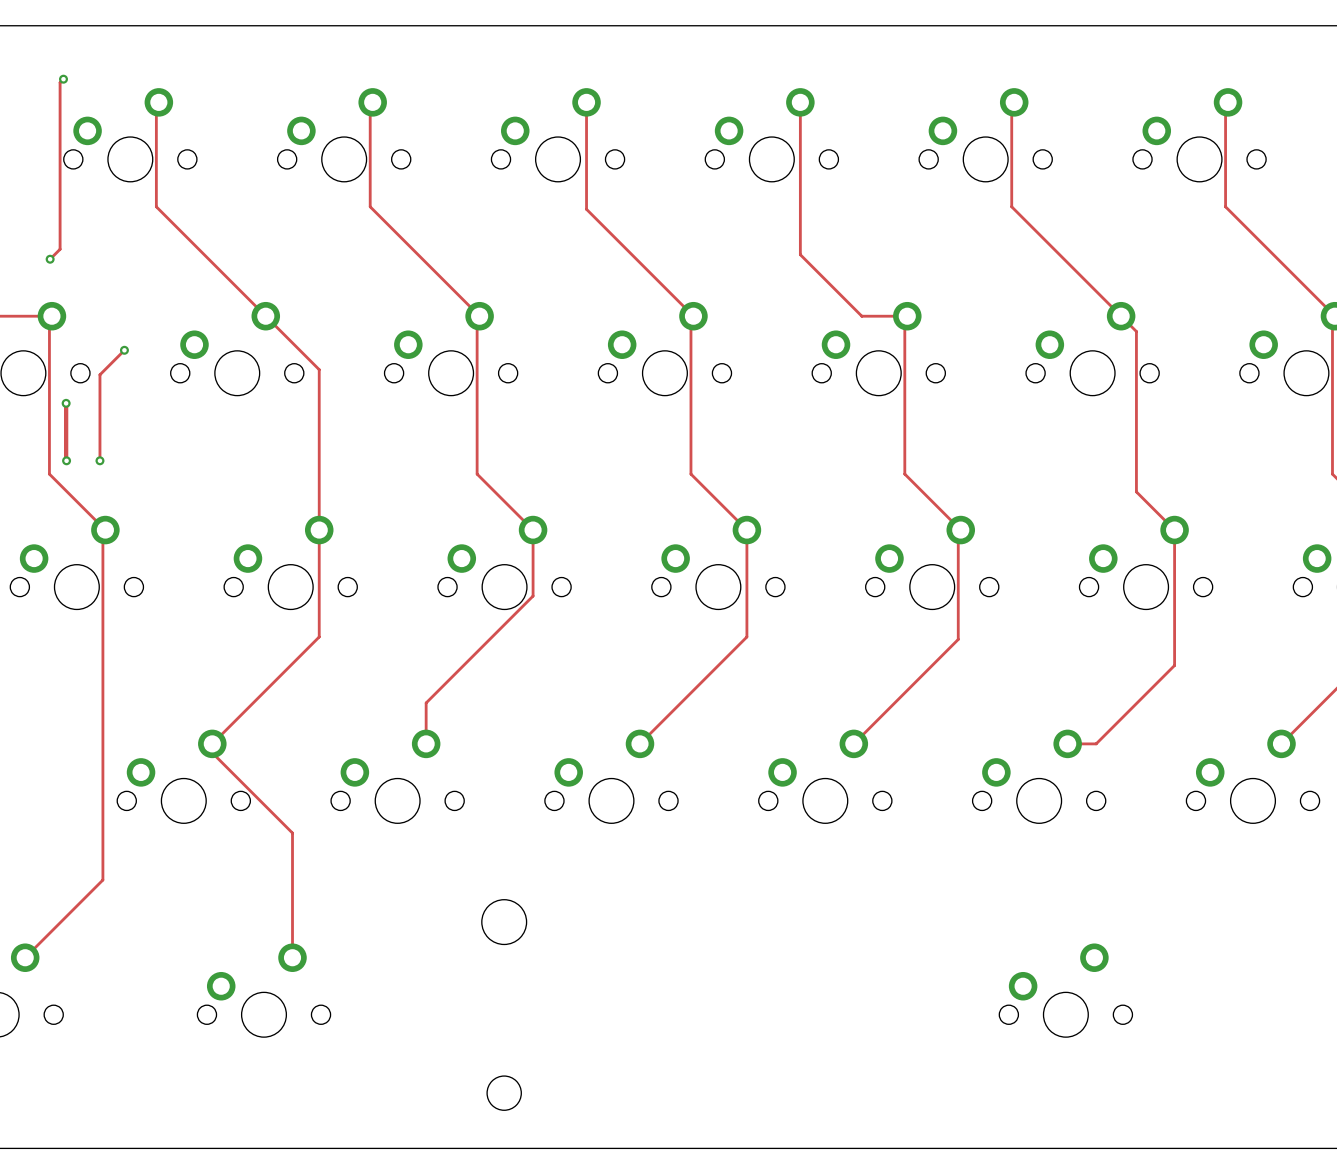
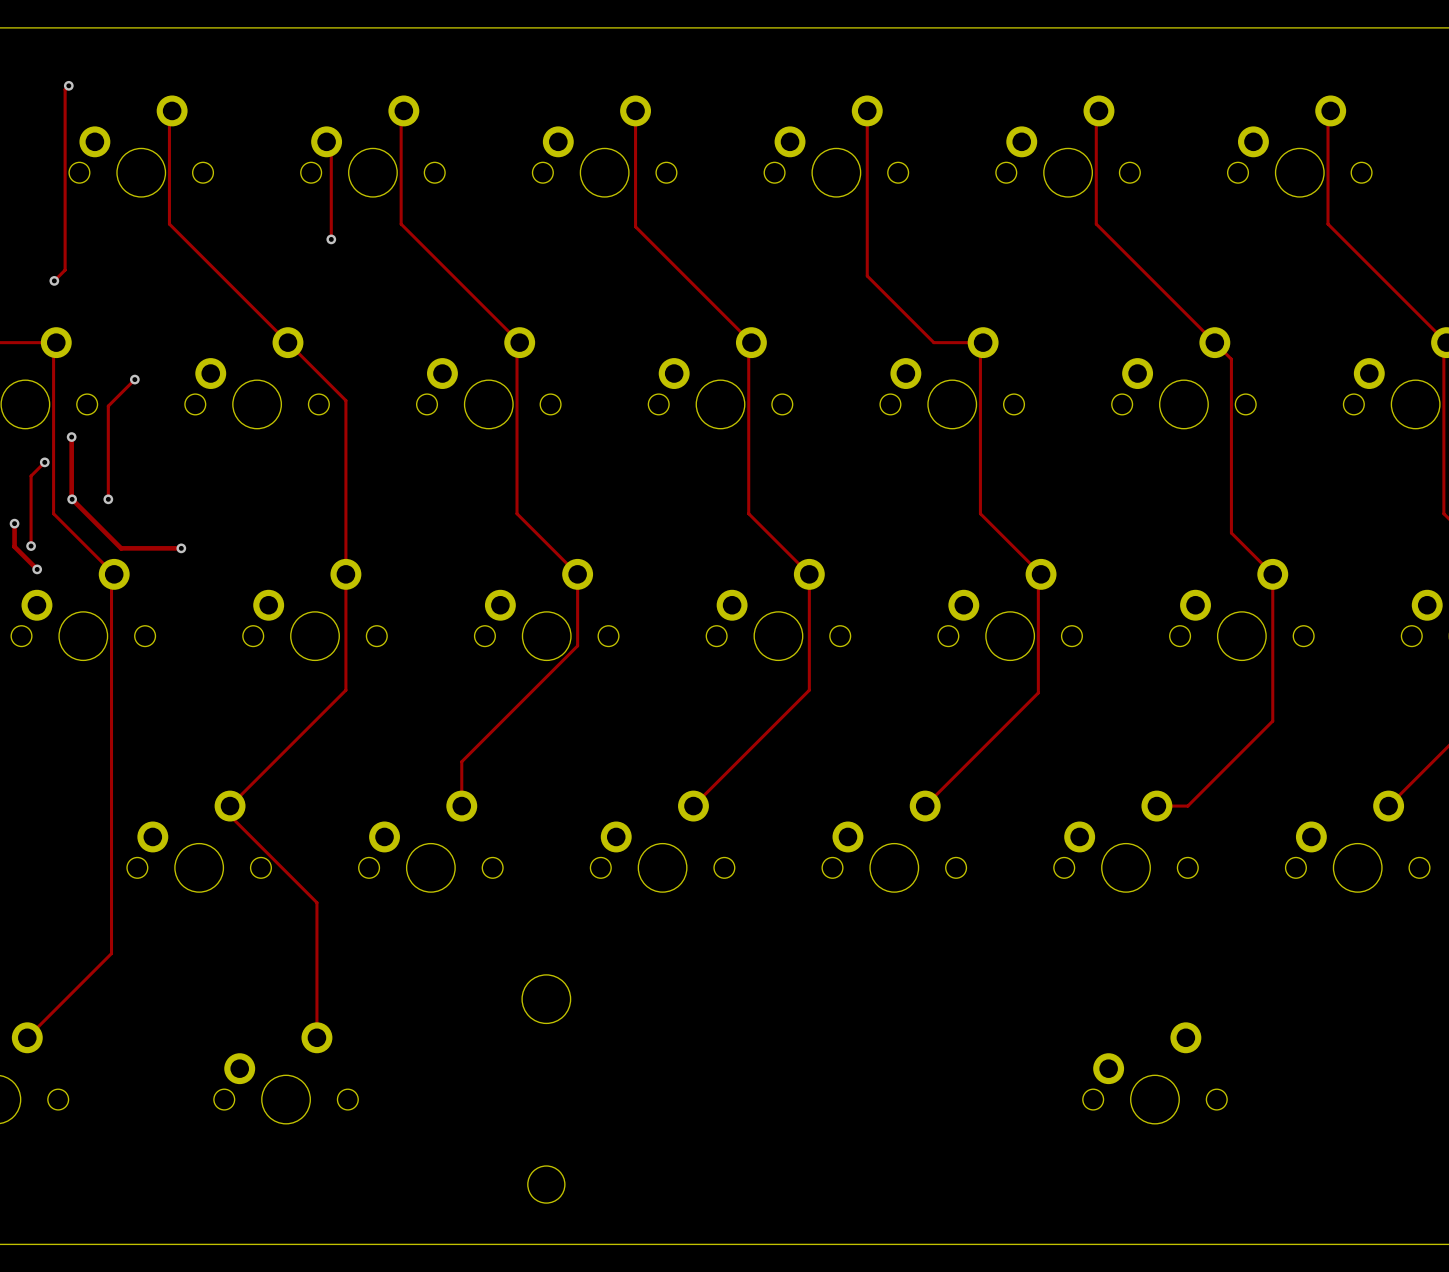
track: none -> (326, 141) (331, 146) (331, 239)
via: none -> (331, 239)
track: none -> (44, 462) (31, 476) (31, 546)
via: none -> (44, 462)
track: none -> (72, 499) (121, 548) (181, 548)
track: none -> (14, 523) (14, 546) (37, 569)
via: none -> (14, 523)
via: none -> (31, 546)
via: none -> (181, 548)
via: none -> (37, 569)

